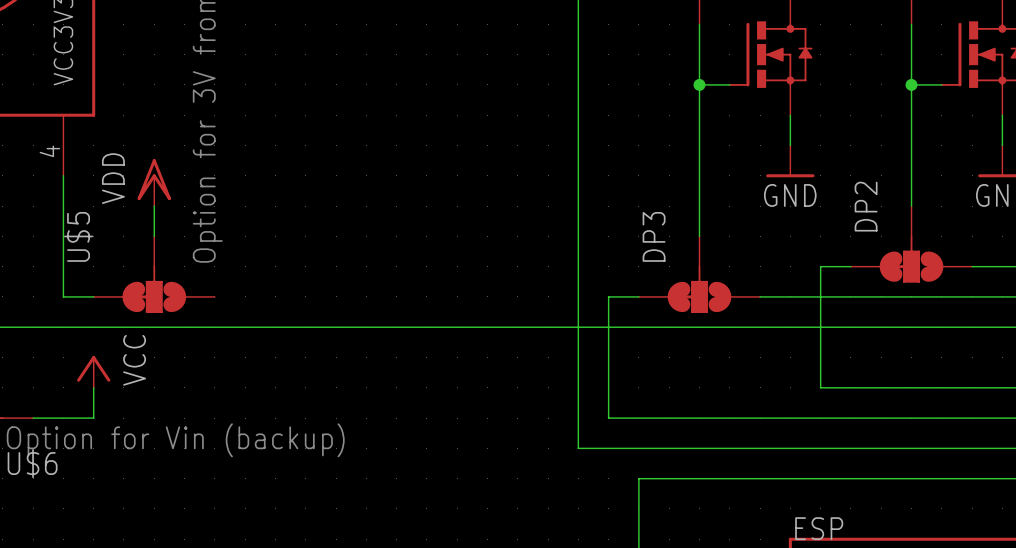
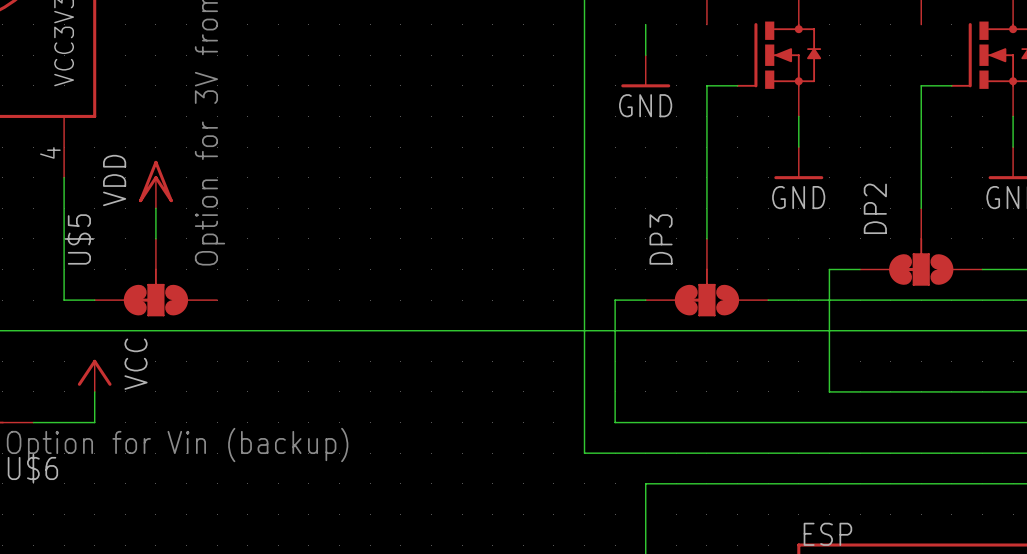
wire: none -> (645, 24) (645, 55)
wire: (699, 24) (699, 84) -> none
wire: (911, 24) (911, 84) -> none
power symbol: none -> GND (645, 71)
junction: (699, 84) -> none
junction: (911, 84) -> none

